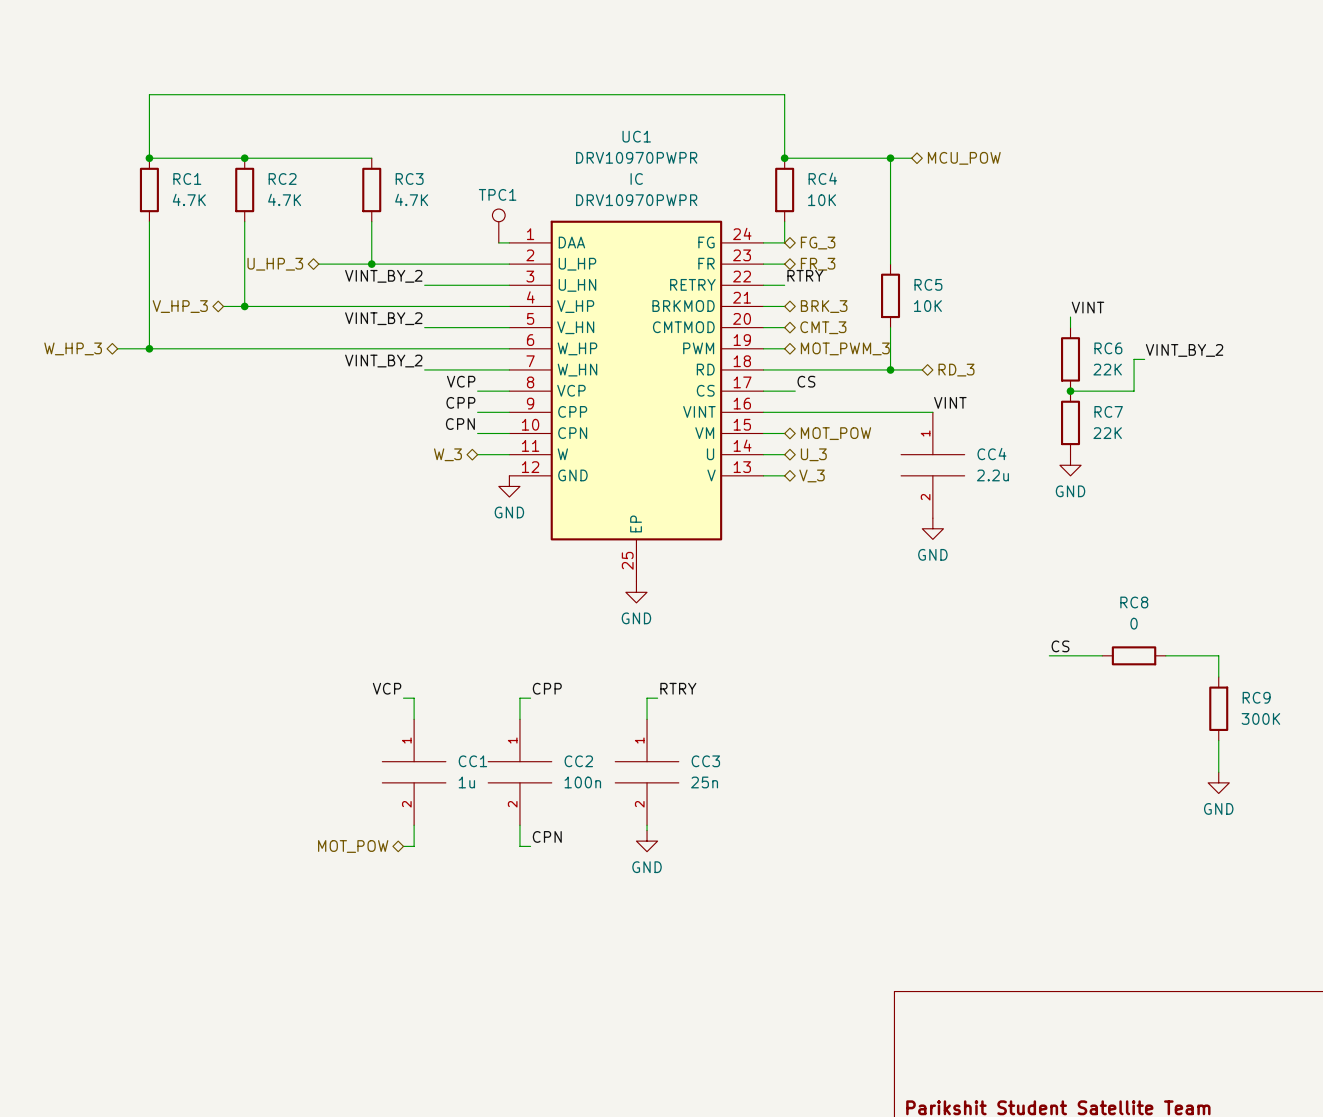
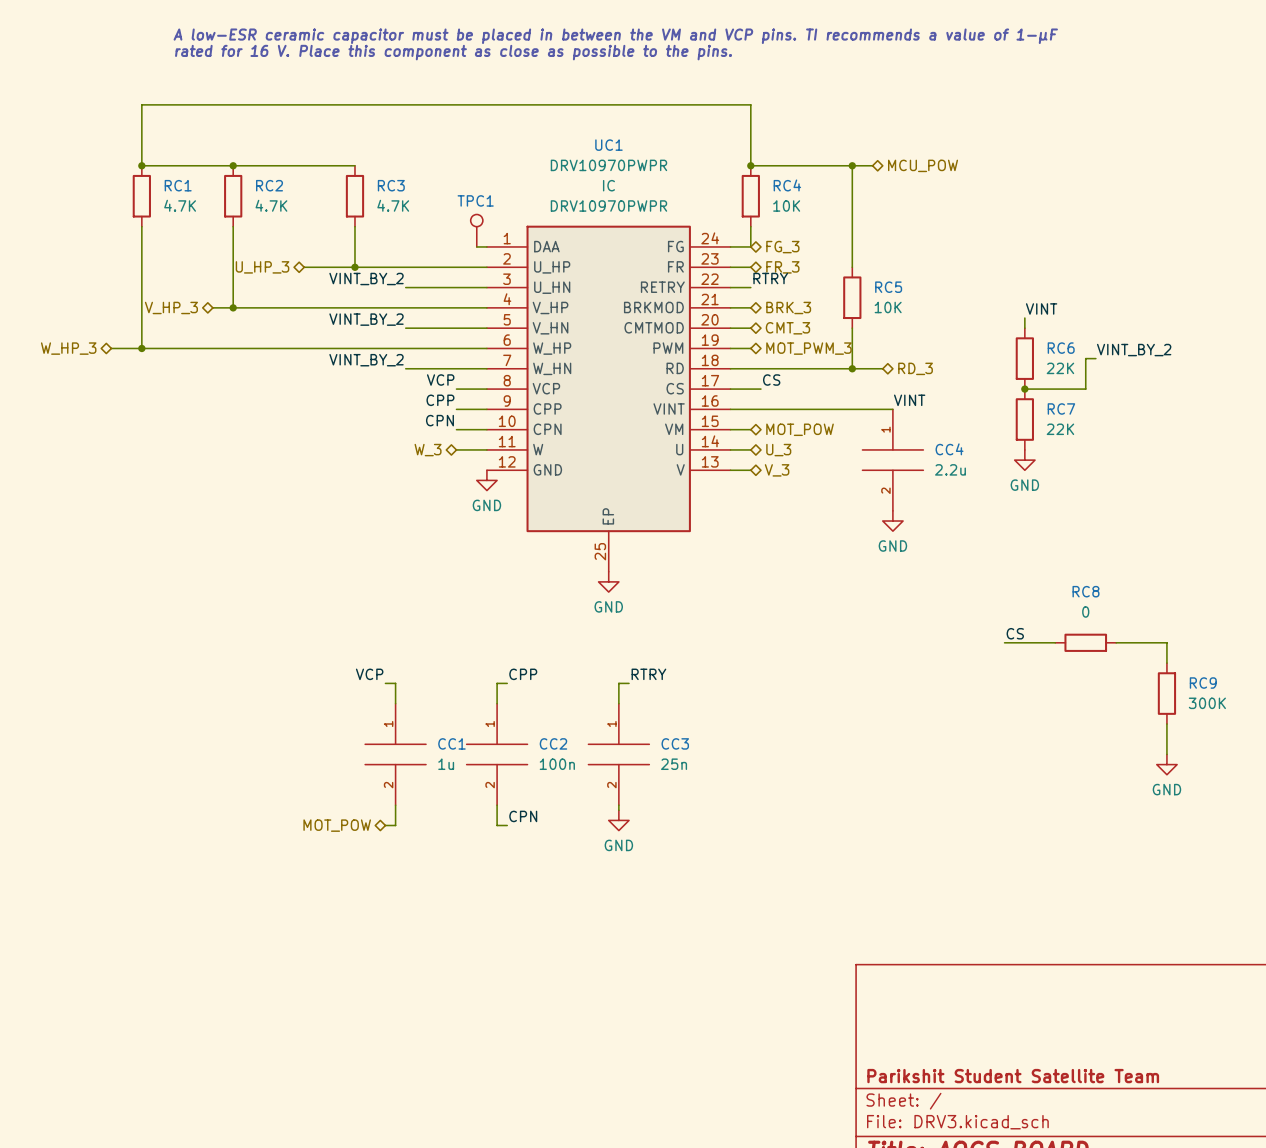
text: none -> A low-ESR ceramic capacitor must be placed in between the VM and VCP pins. TI recommends a value of 1-µF (615, 36)
text: none -> rated for 16 V. Place this component as close as possible to the pins. (453, 52)

